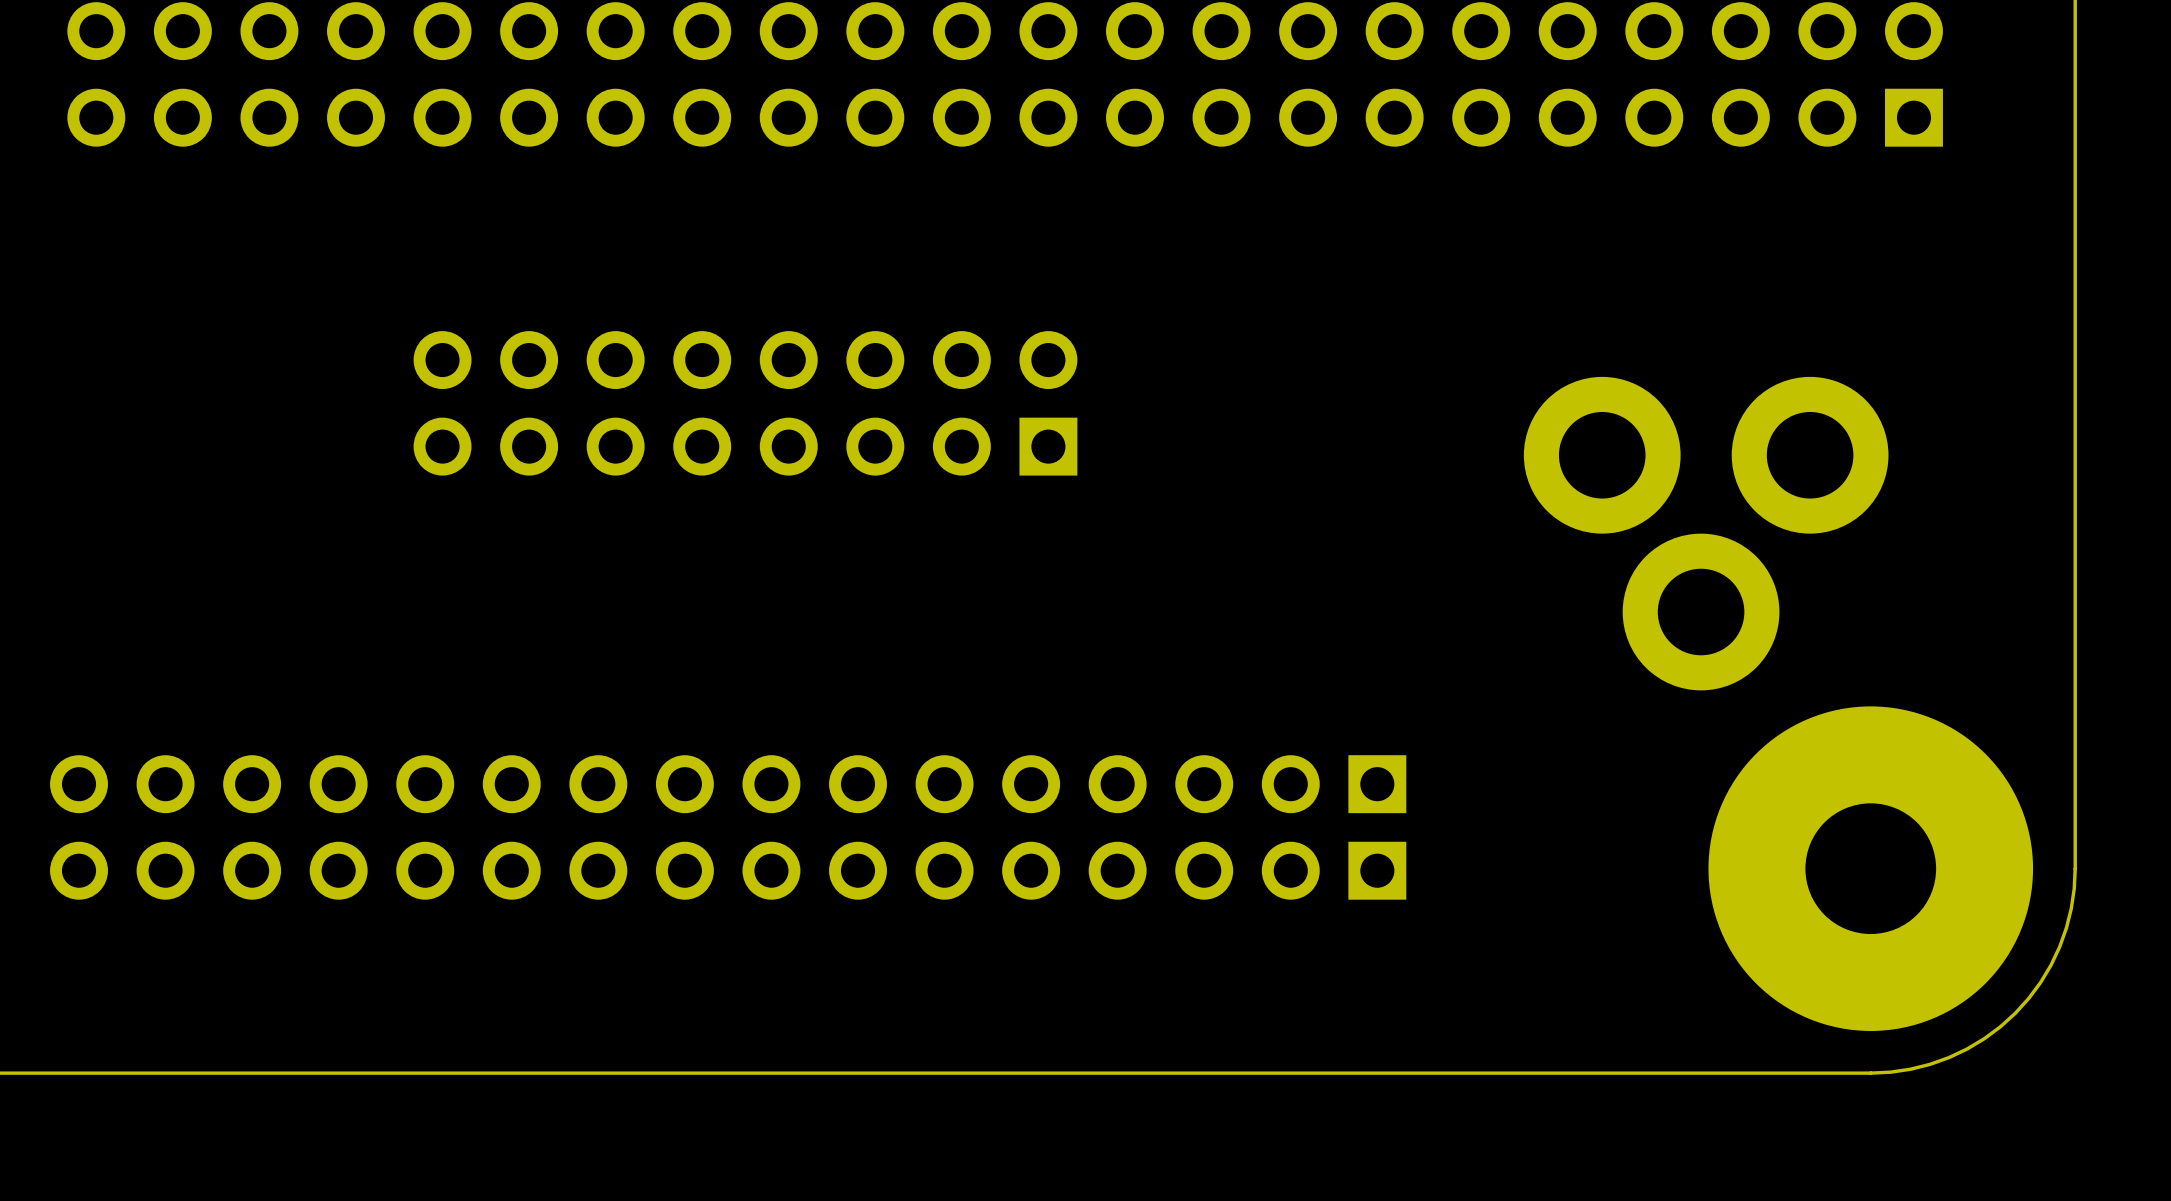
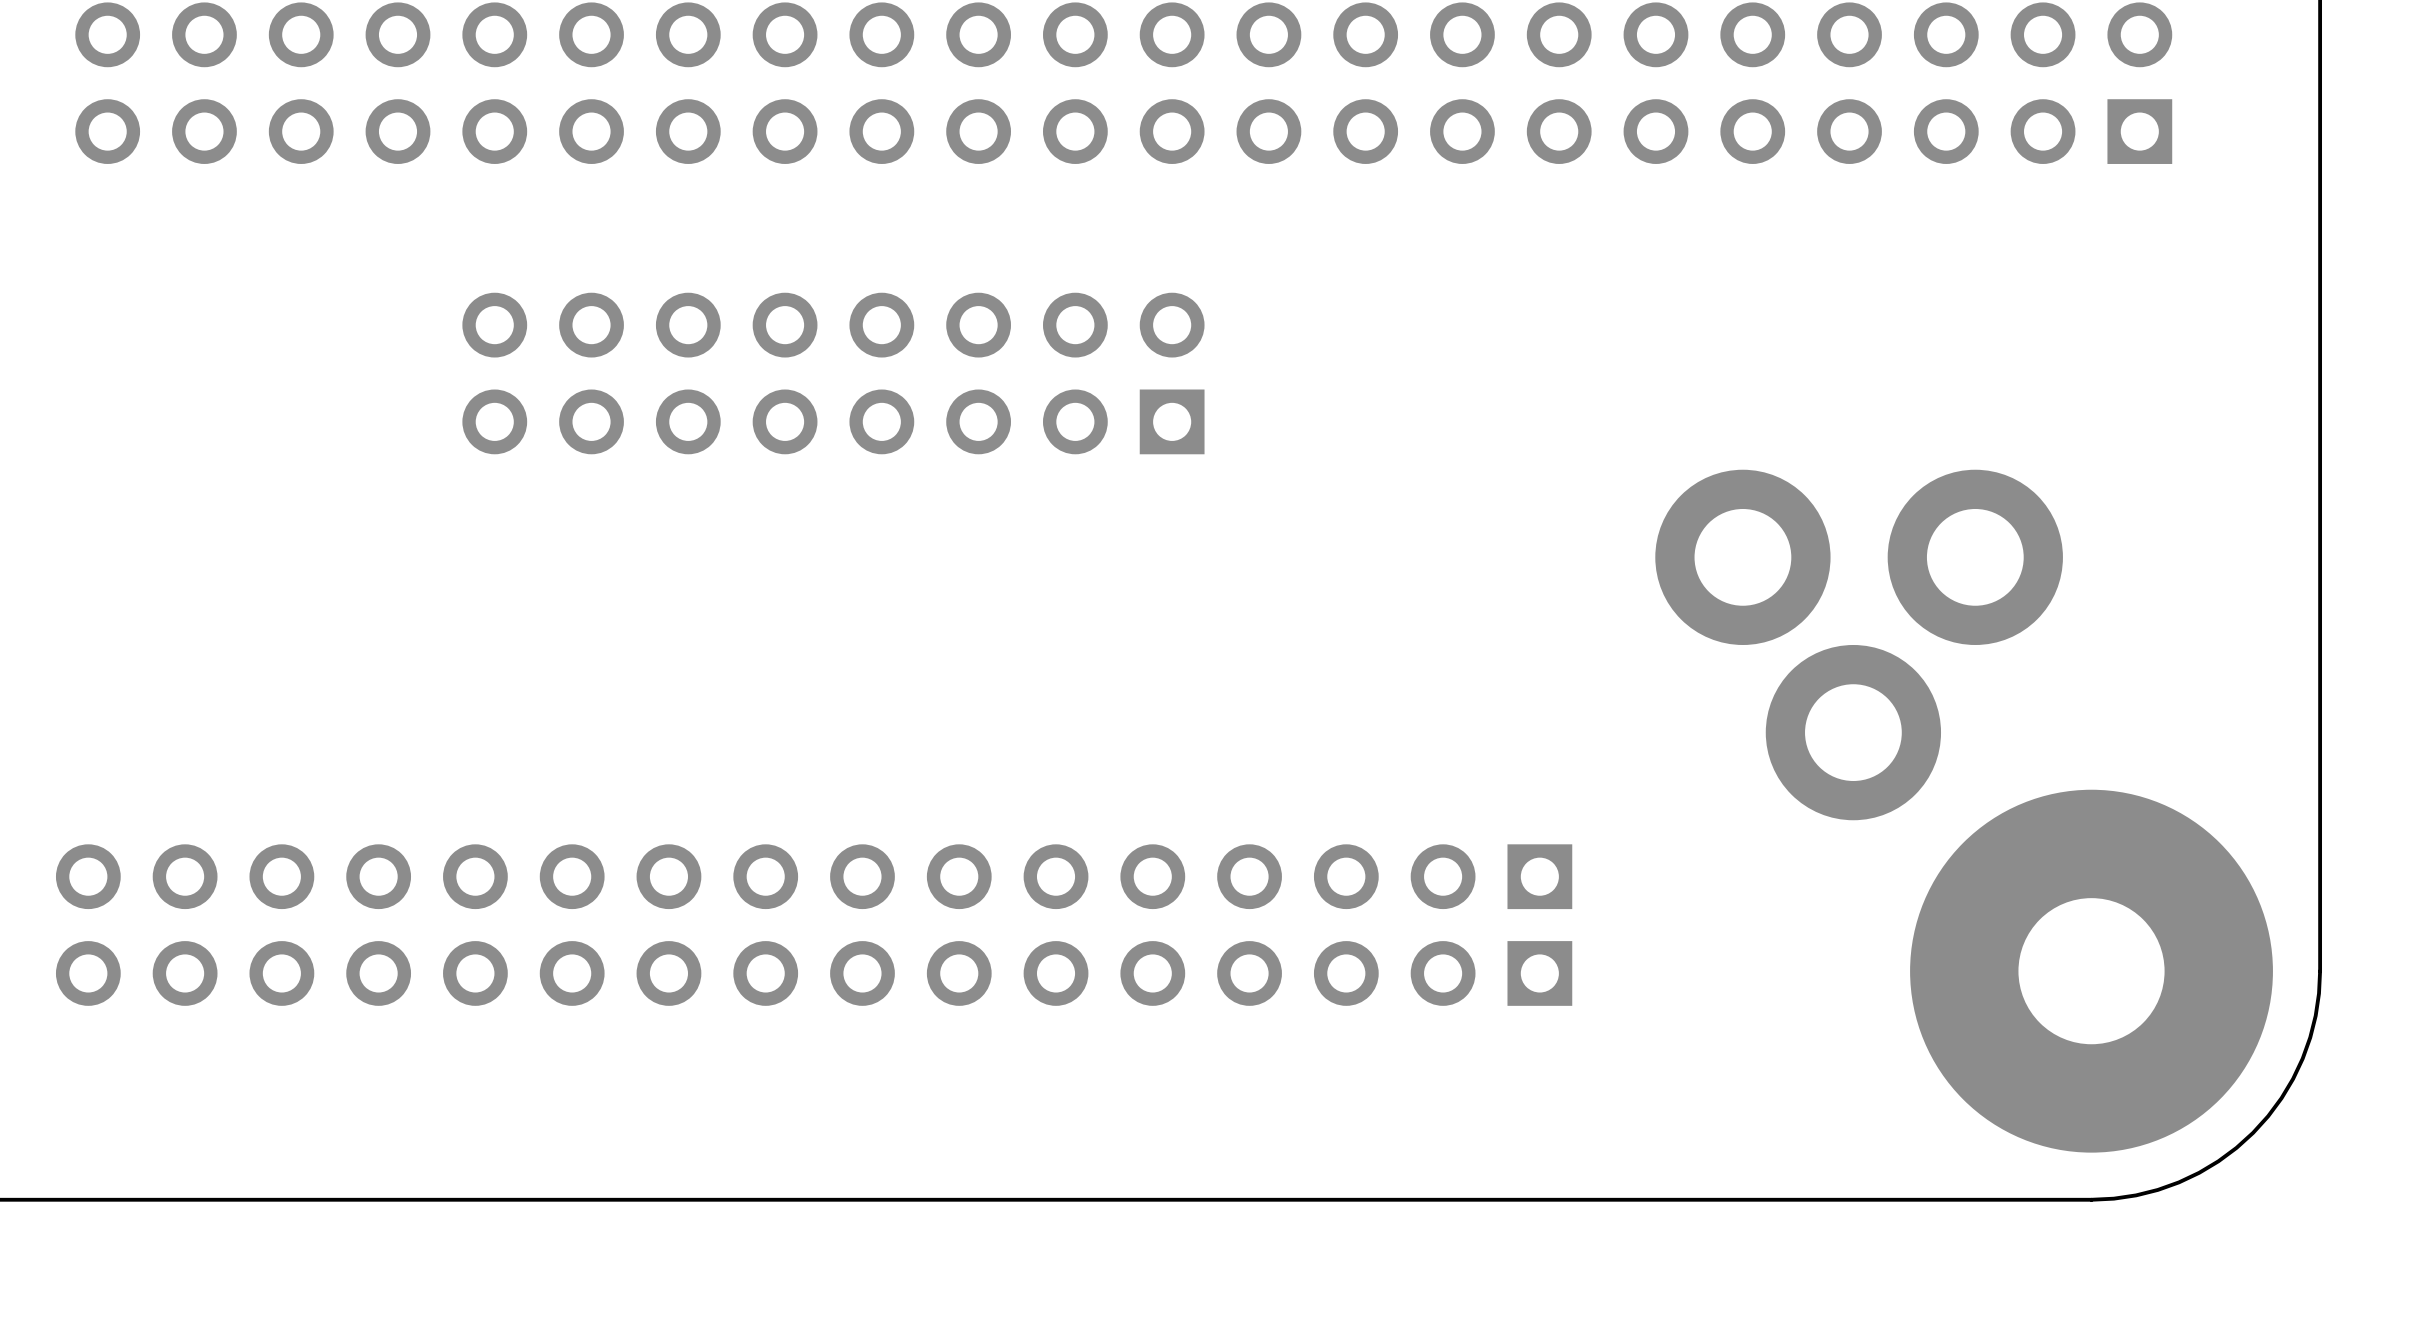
part position: (745, 403) -> (833, 373)
part position: (1706, 533) -> (1859, 644)

